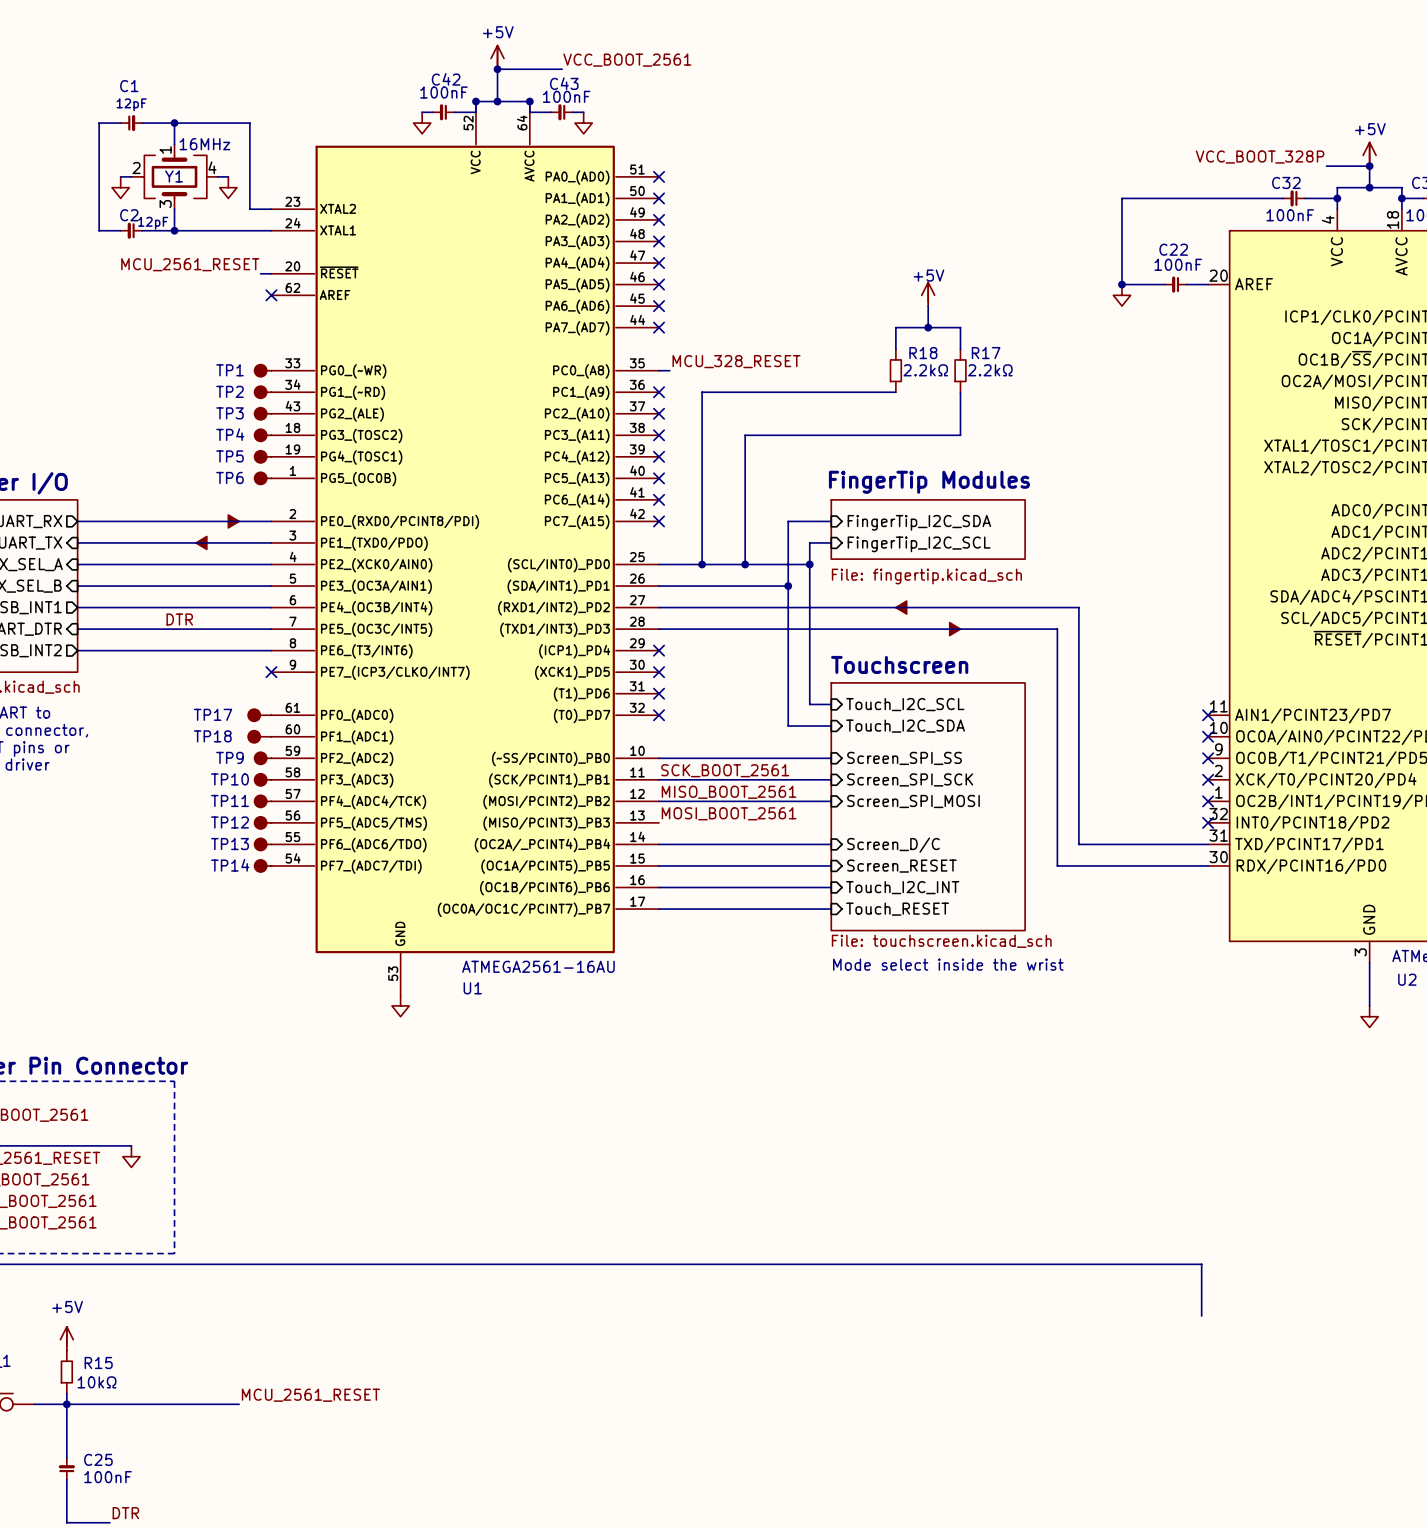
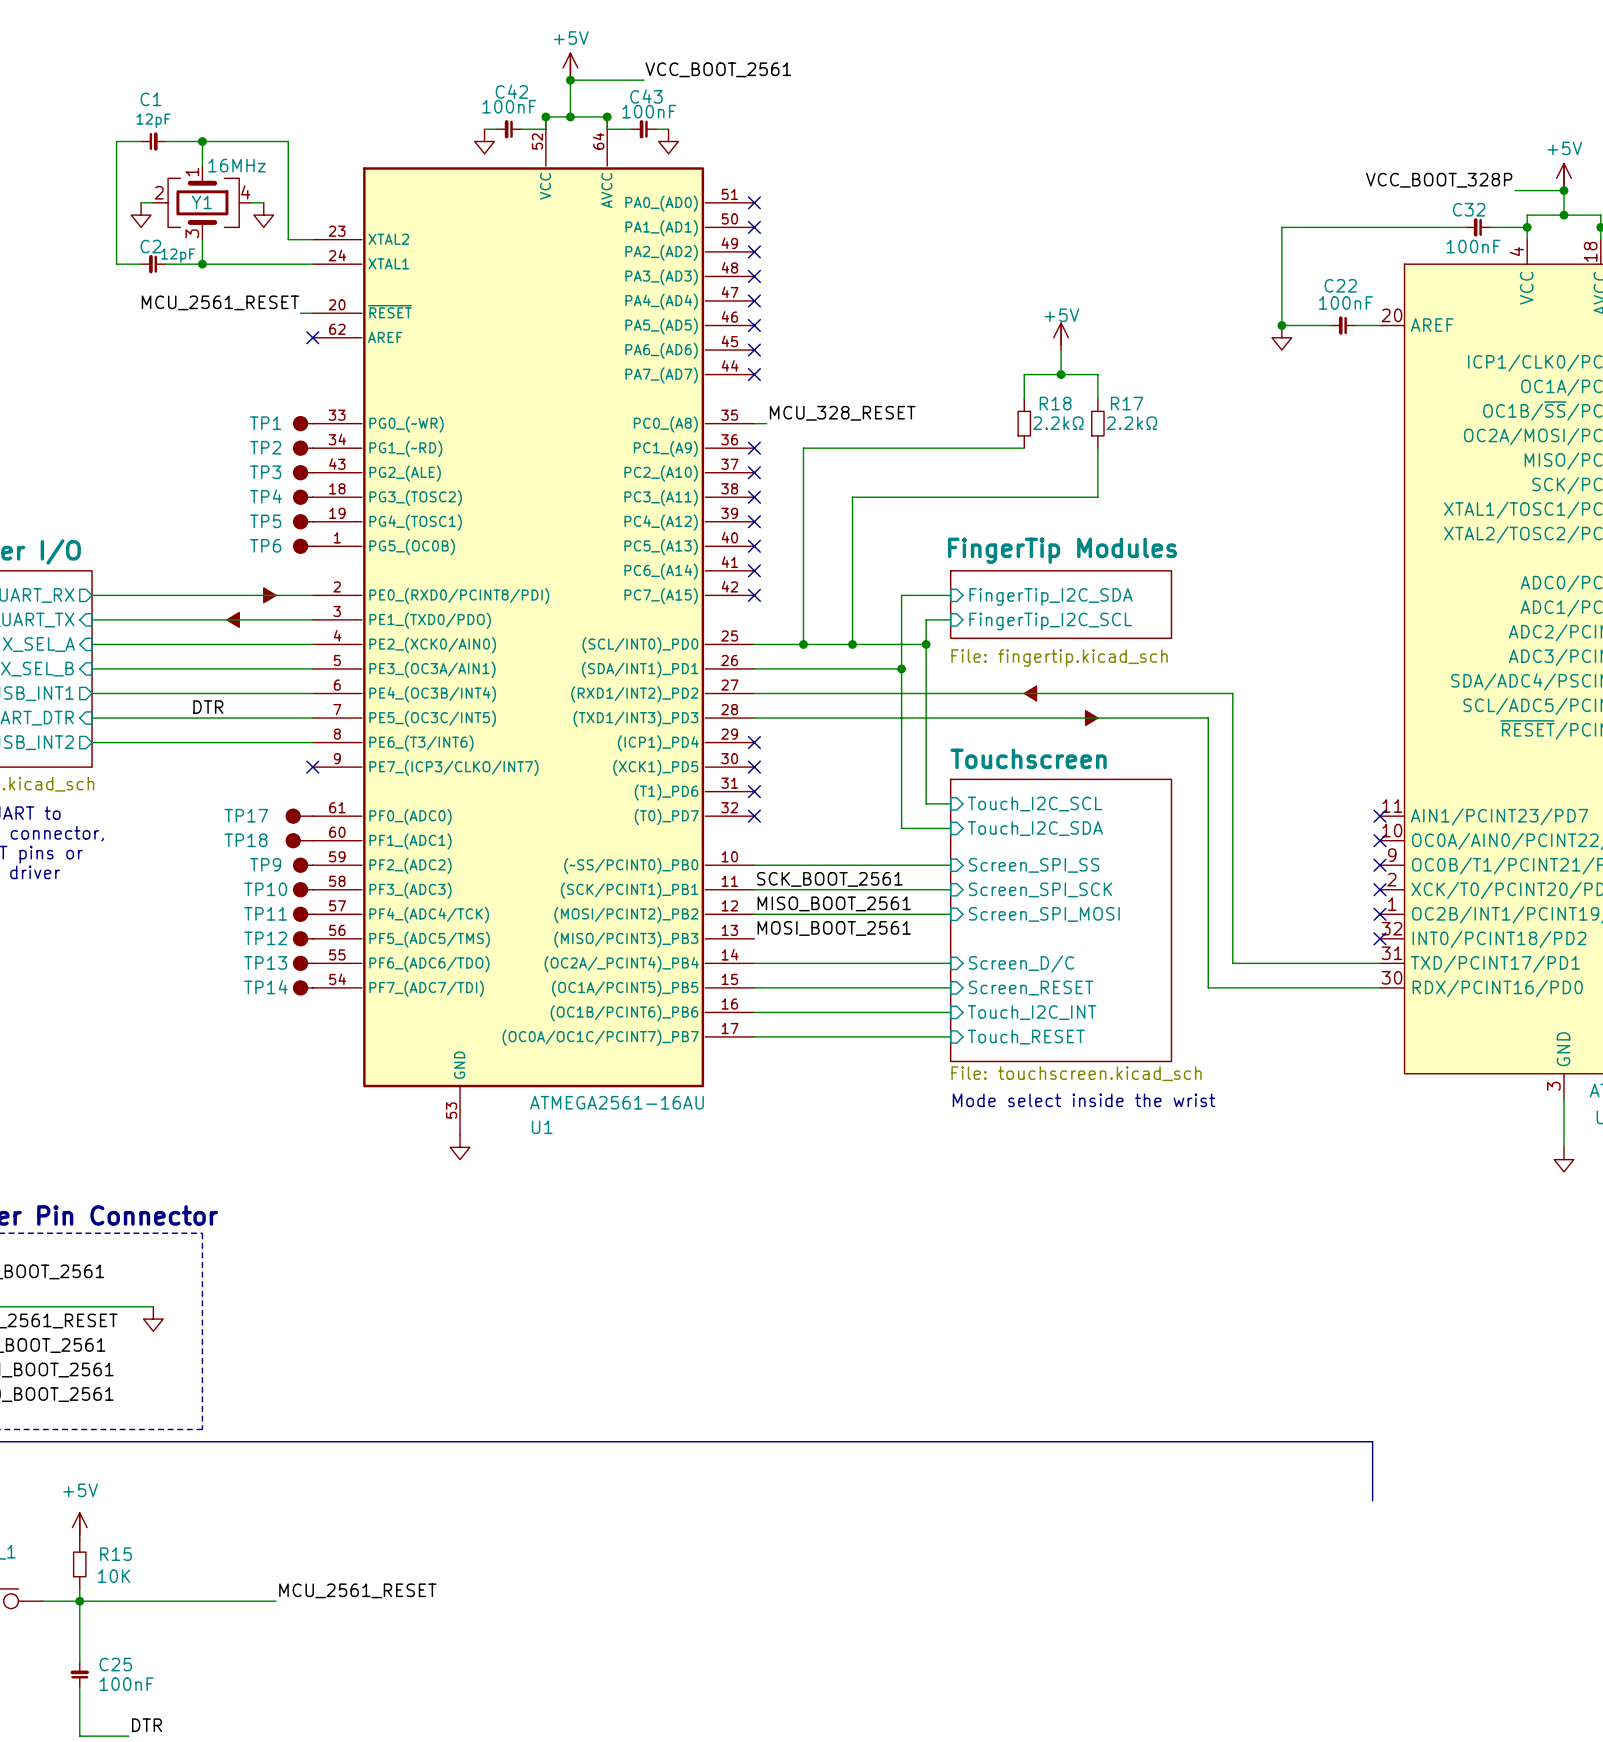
R15 value: 10kΩ (97, 1382) -> 10K (114, 1576)

